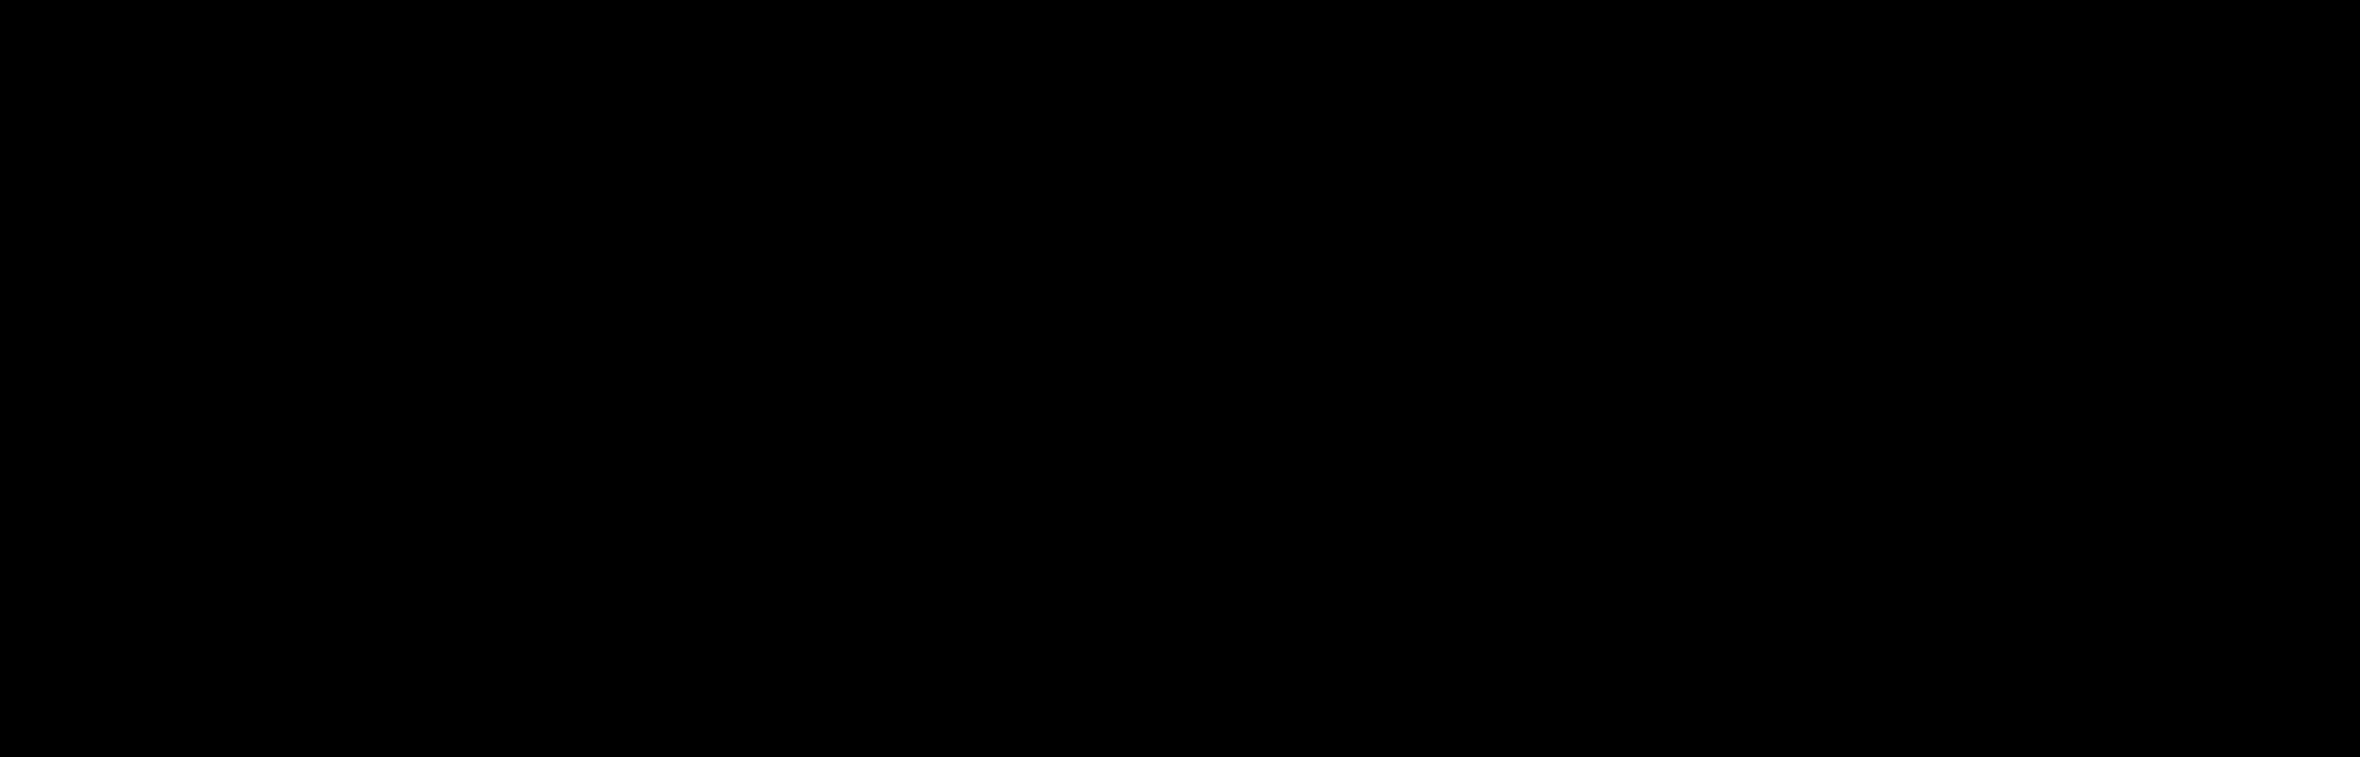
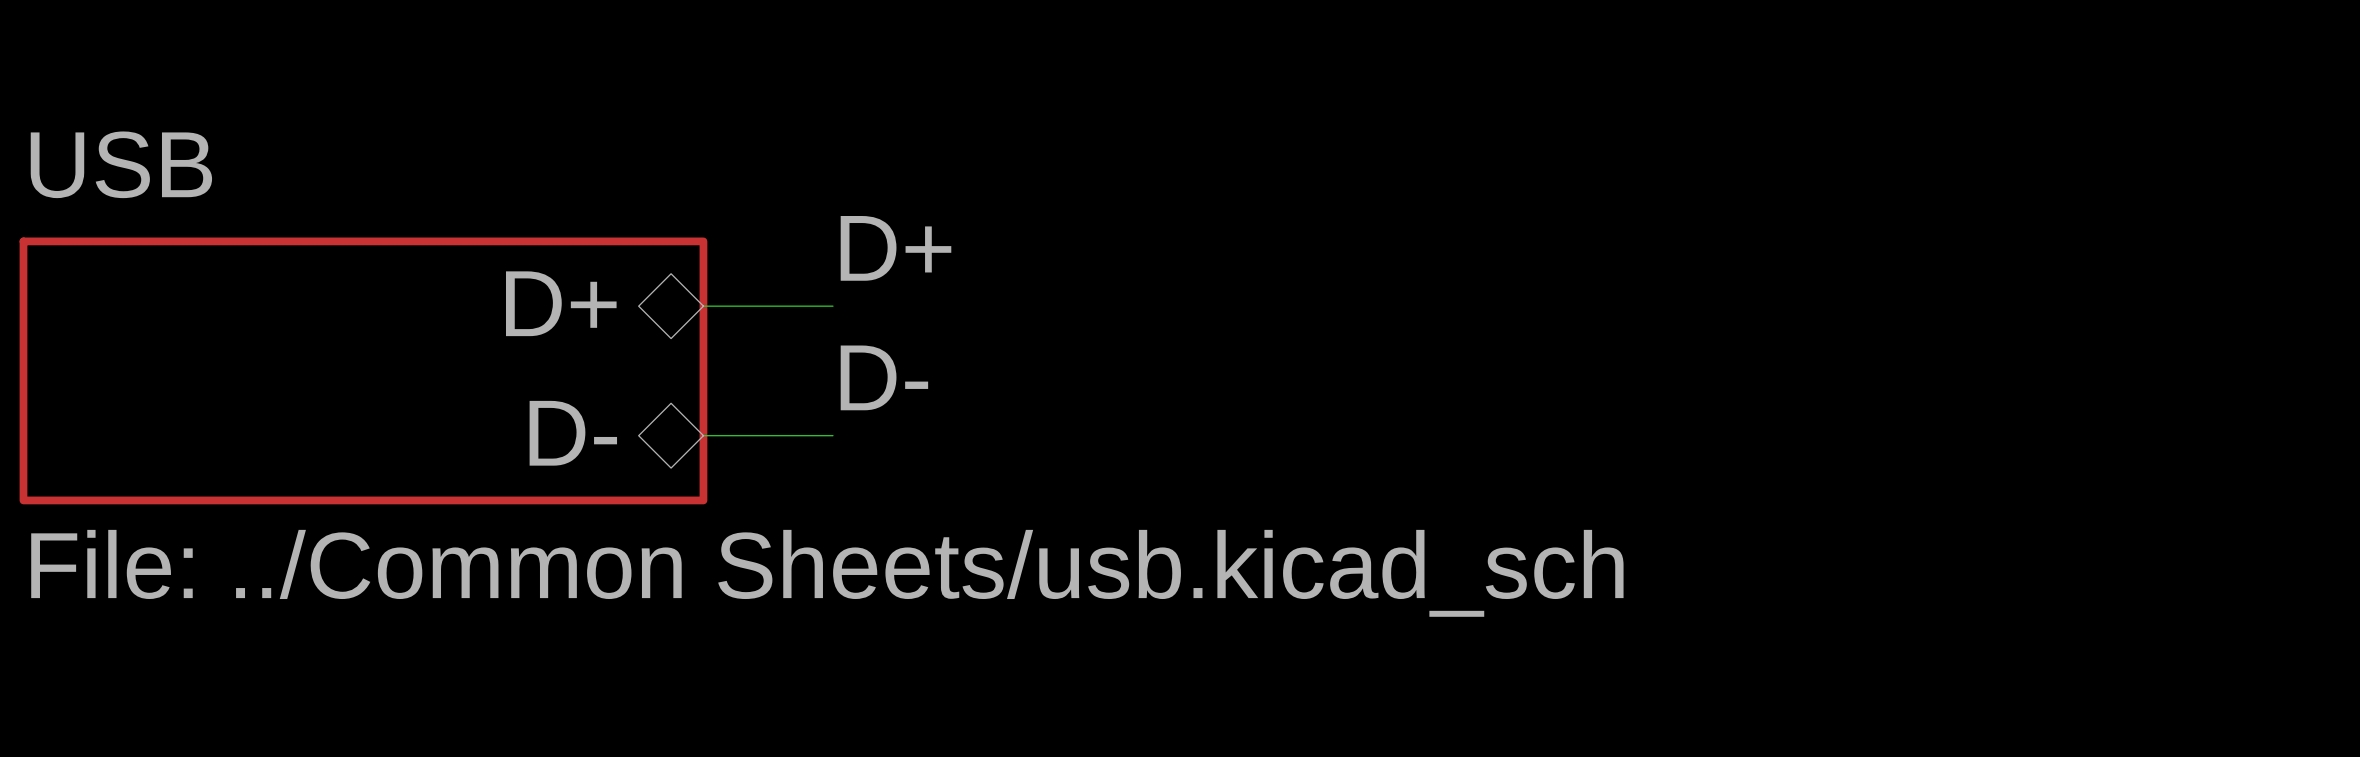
label: none -> D+ (895, 248)
sheet pin: none -> D+ (561, 303)
wire: none -> (703, 306) (832, 306)
sheet USB: none -> File: ../Common Sheets/usb.kicad_sch (363, 370)
label: none -> D- (884, 377)
sheet pin: none -> D- (573, 433)
wire: none -> (703, 435) (832, 435)

